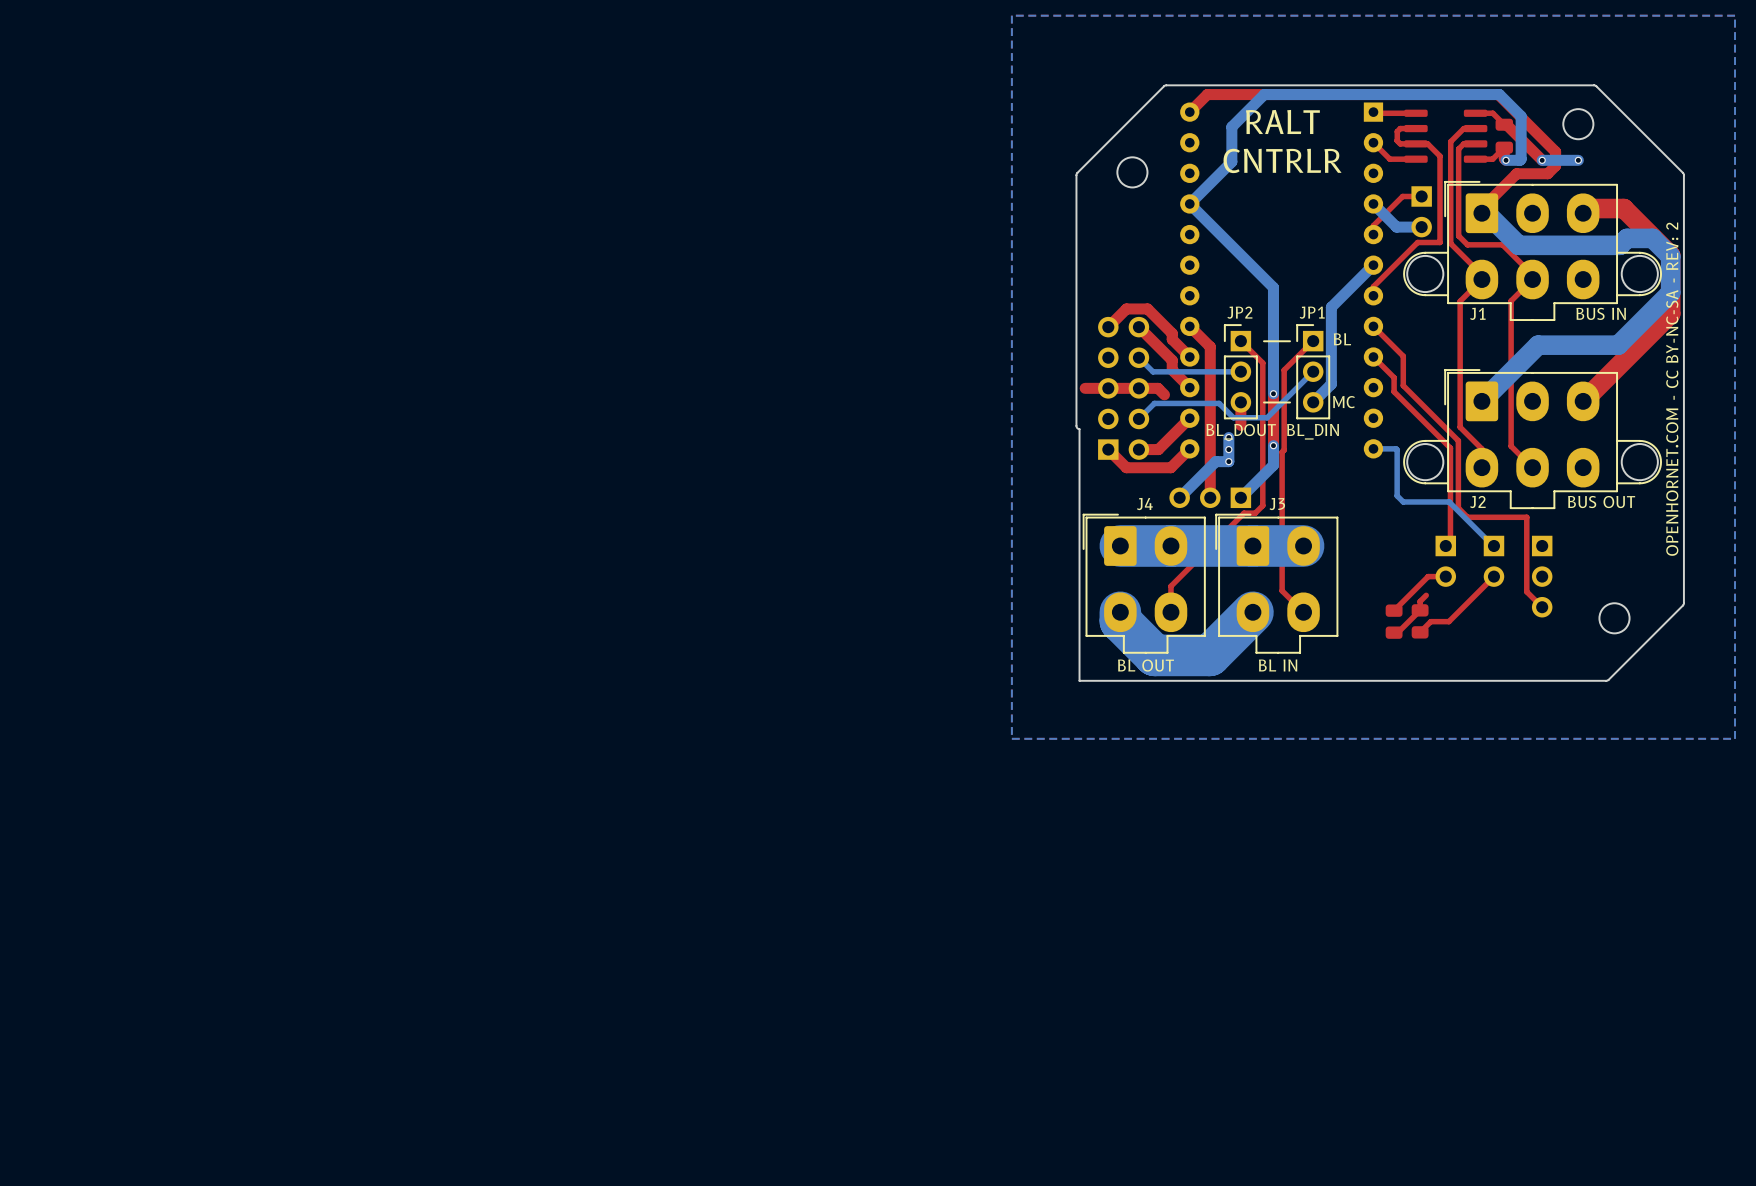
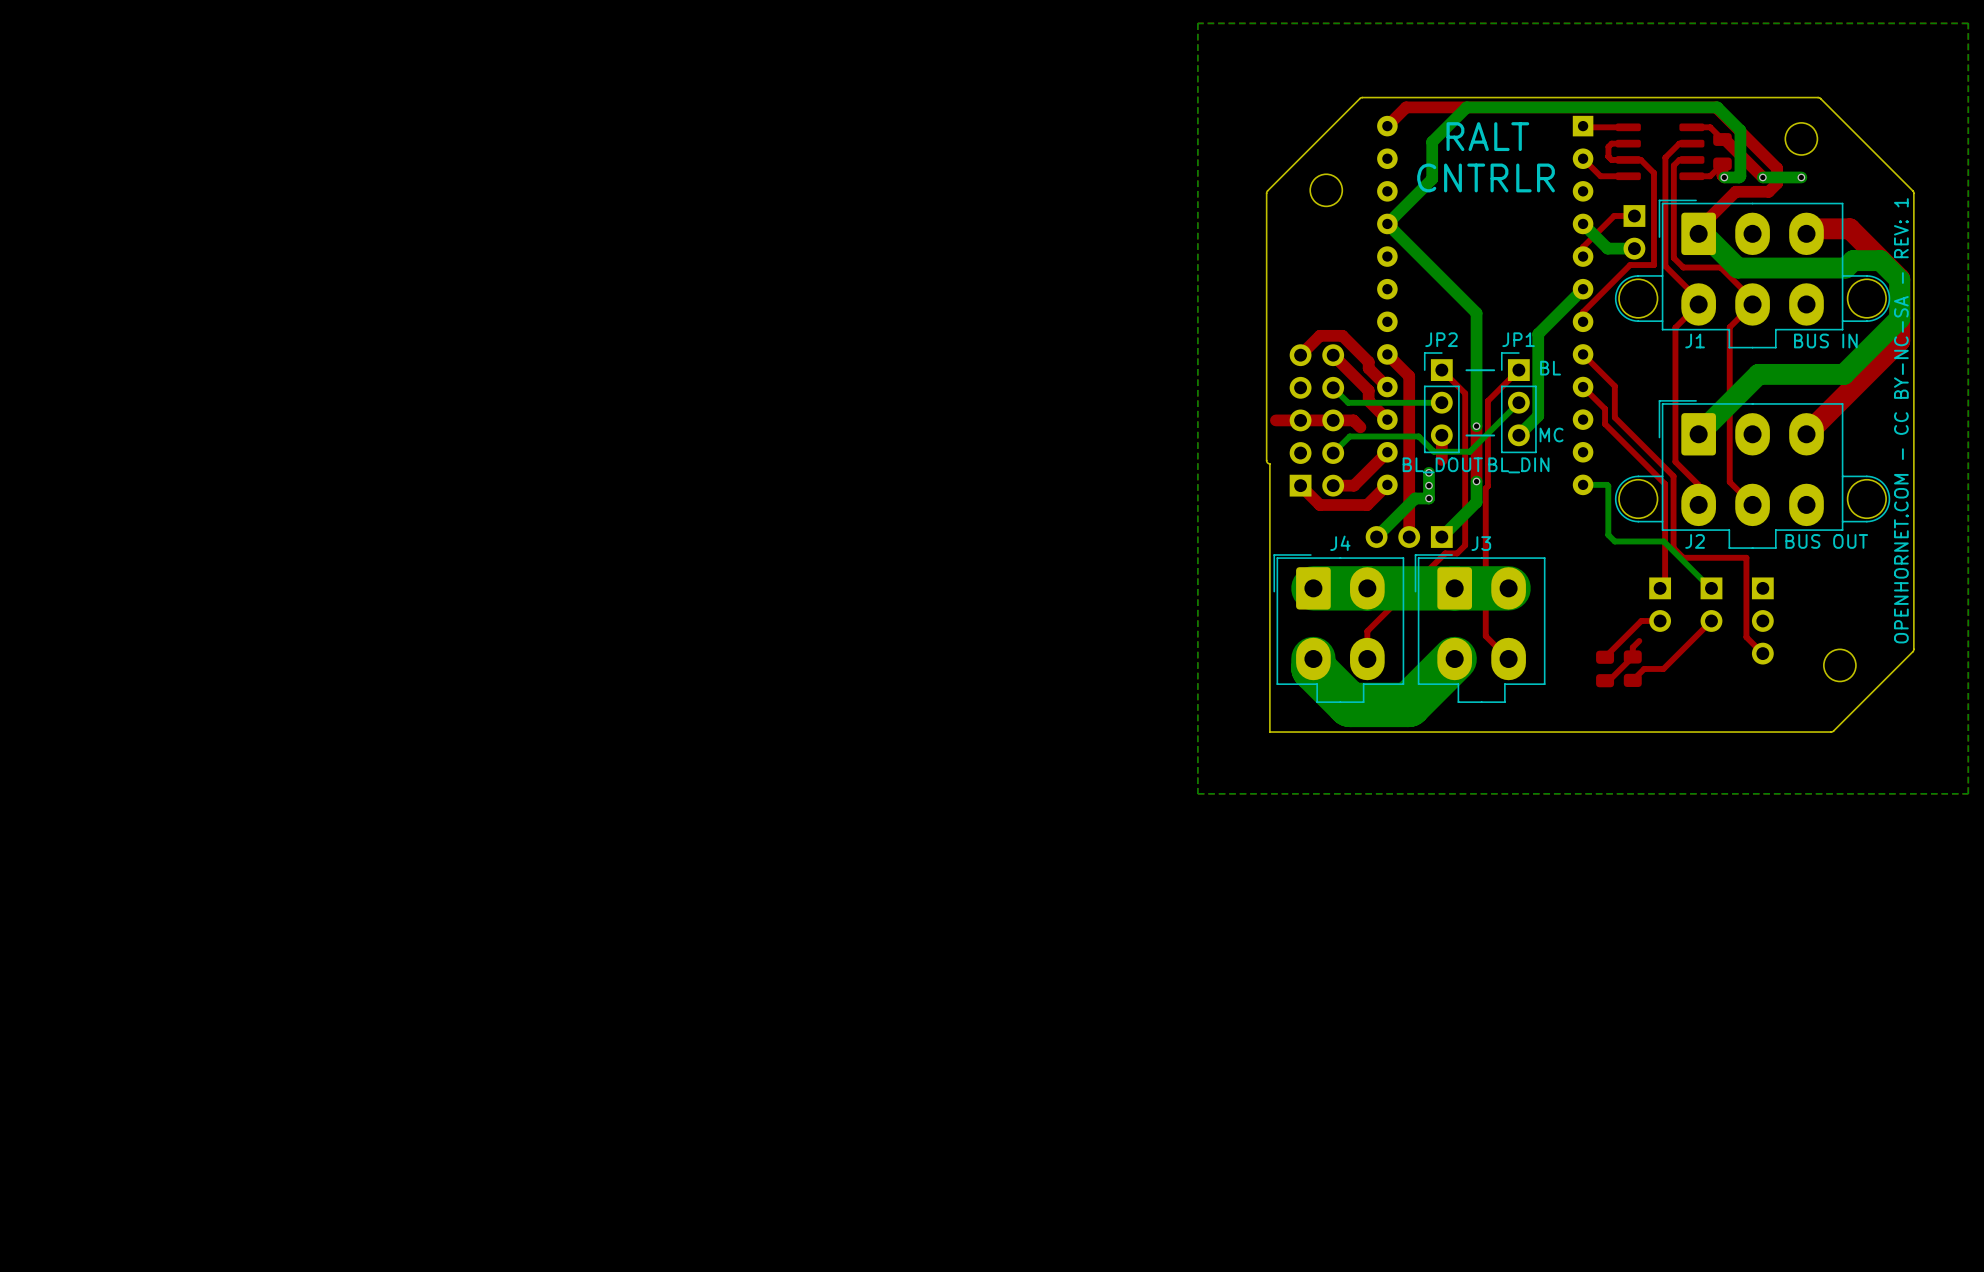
text: OPENHORNET.COM - CC BY-NC-SA - REV: 2 (1672, 389) -> OPENHORNET.COM - CC BY-NC-SA - REV: 1 (1901, 420)
J4 value: BL OUT (1145, 665) -> none
J3 value: BL IN (1278, 665) -> none

